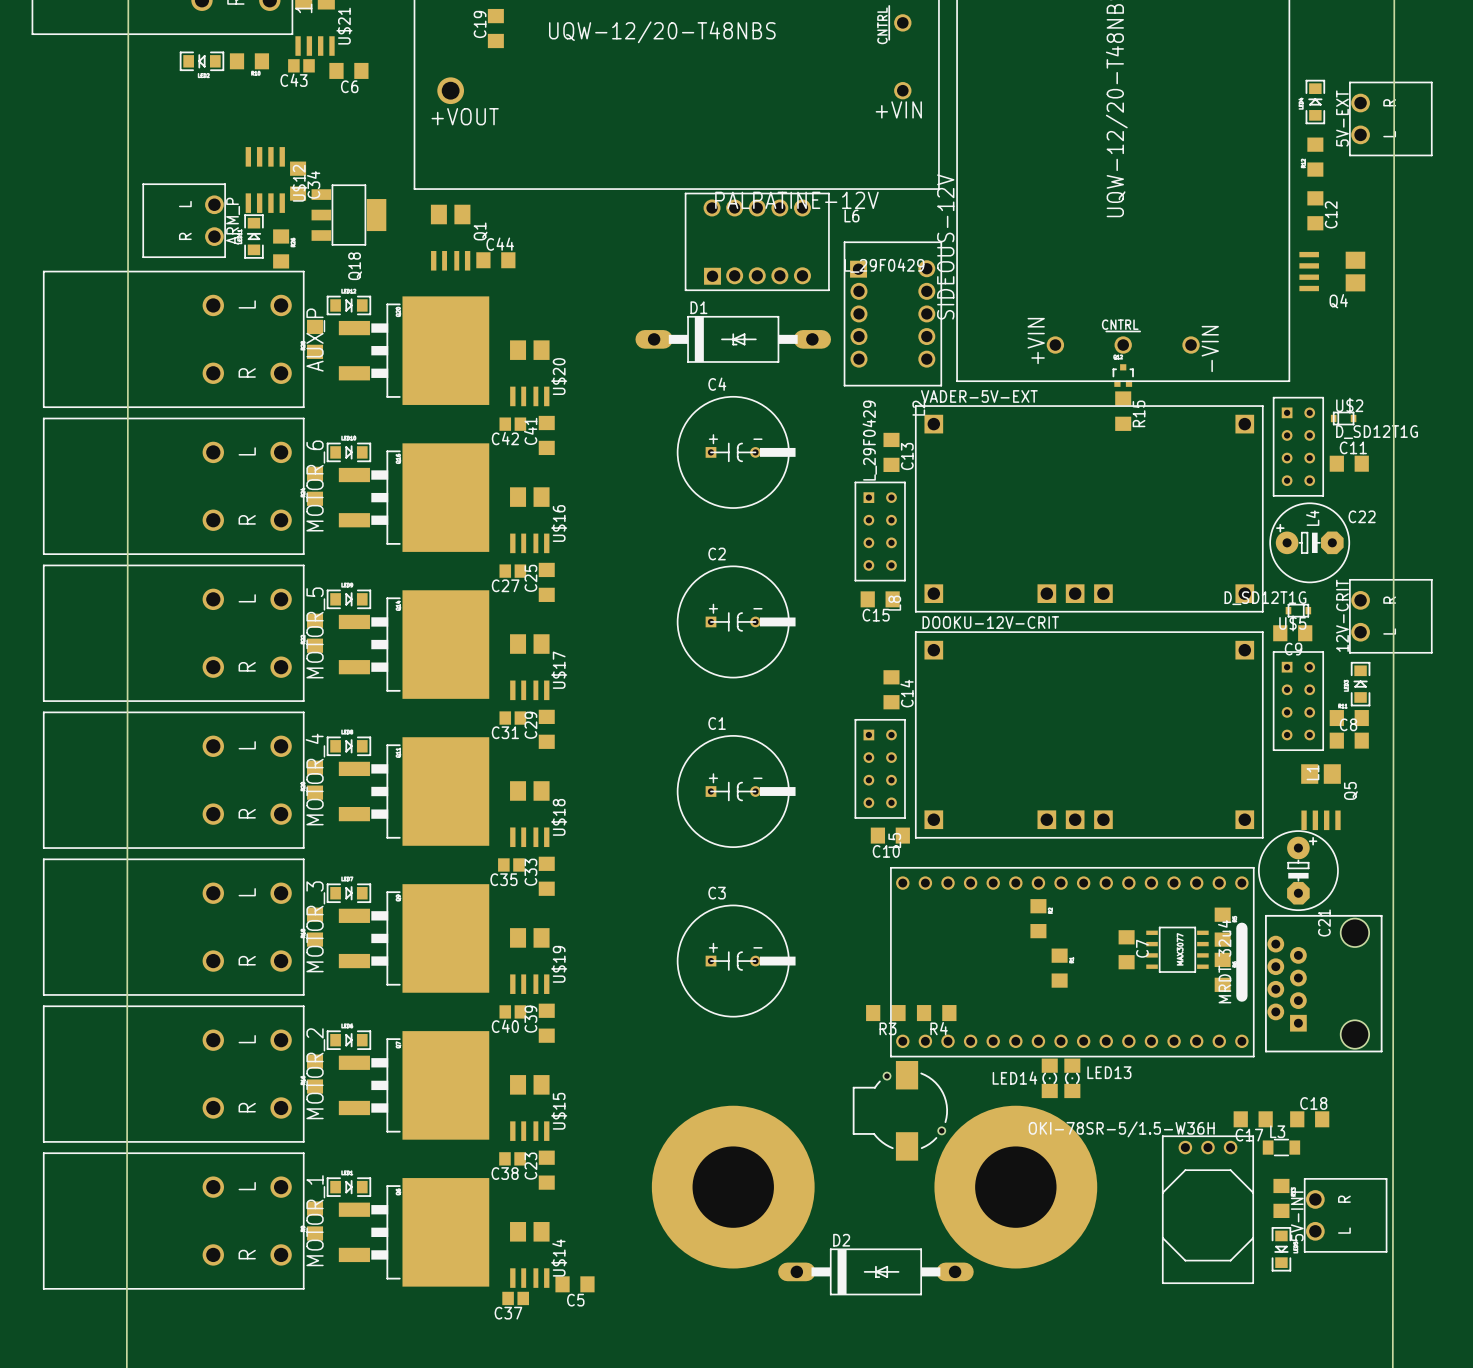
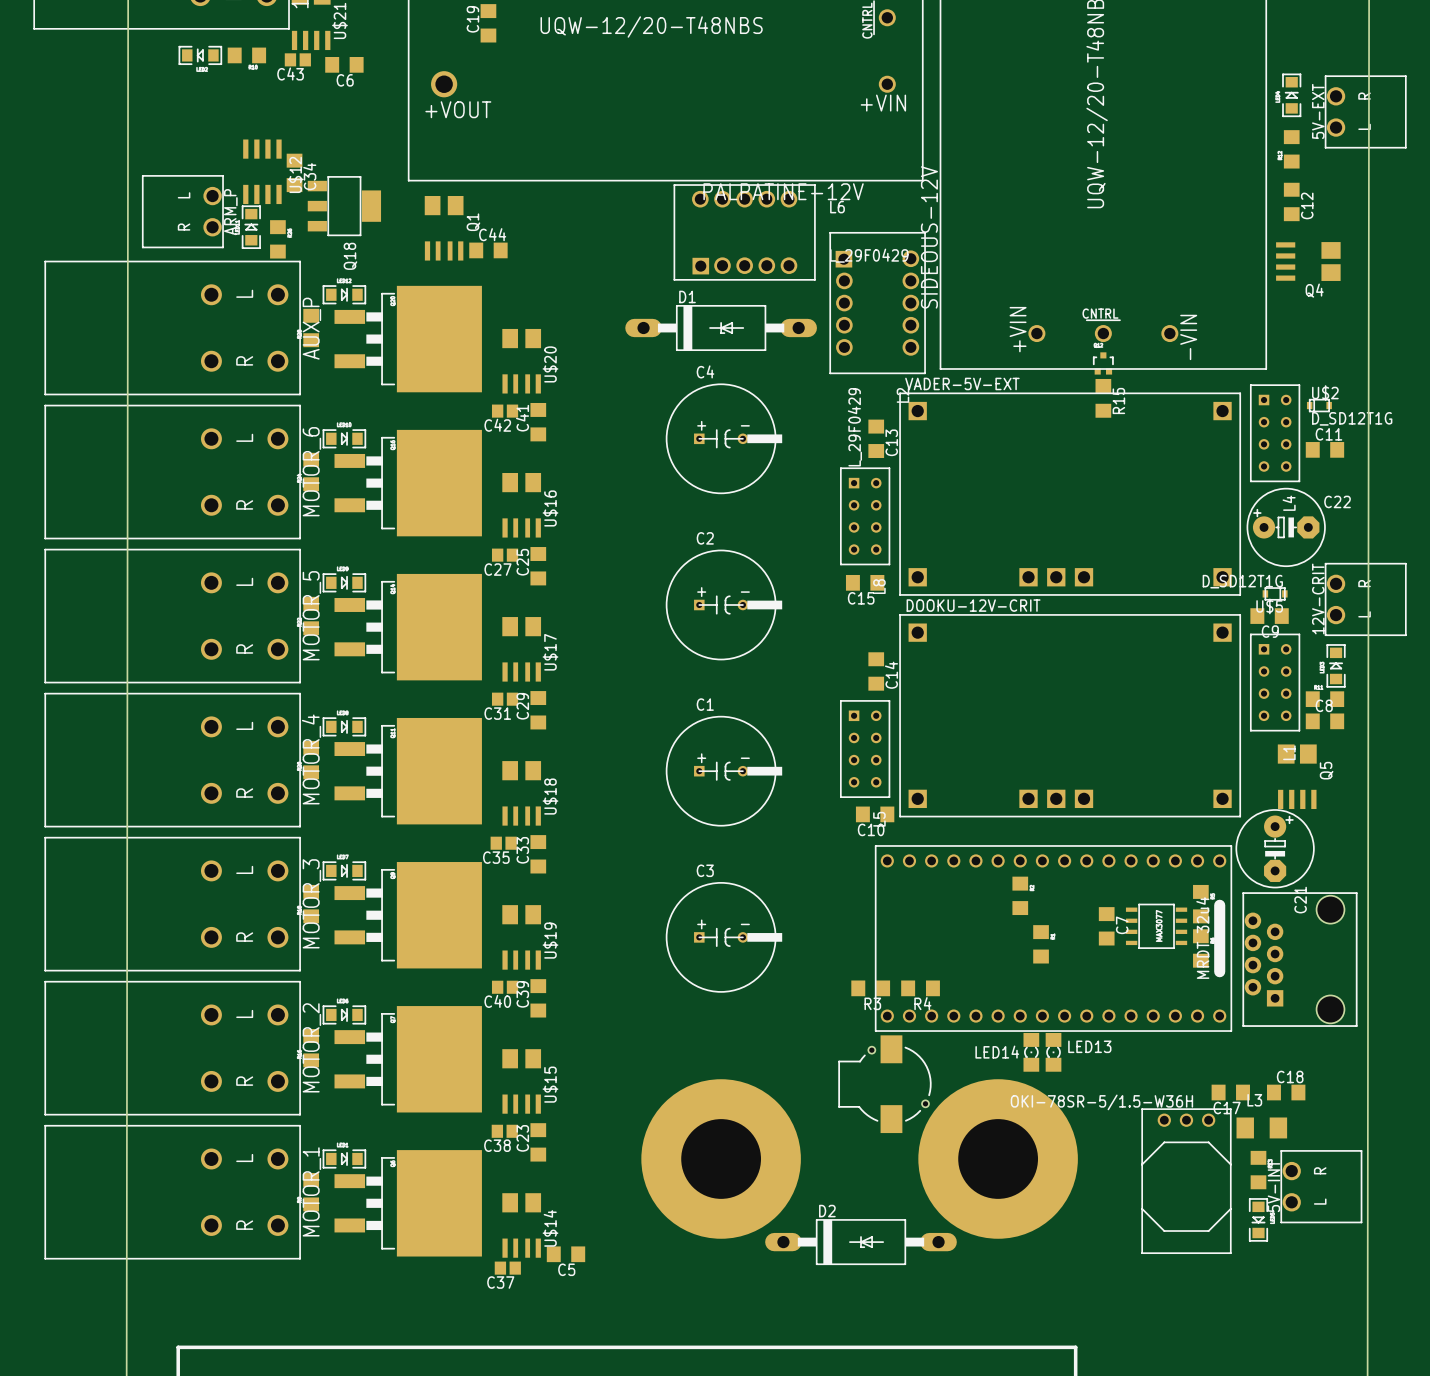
L3 footprint: [1262, 1139, 1301, 1156] -> [1236, 1117, 1288, 1139]

